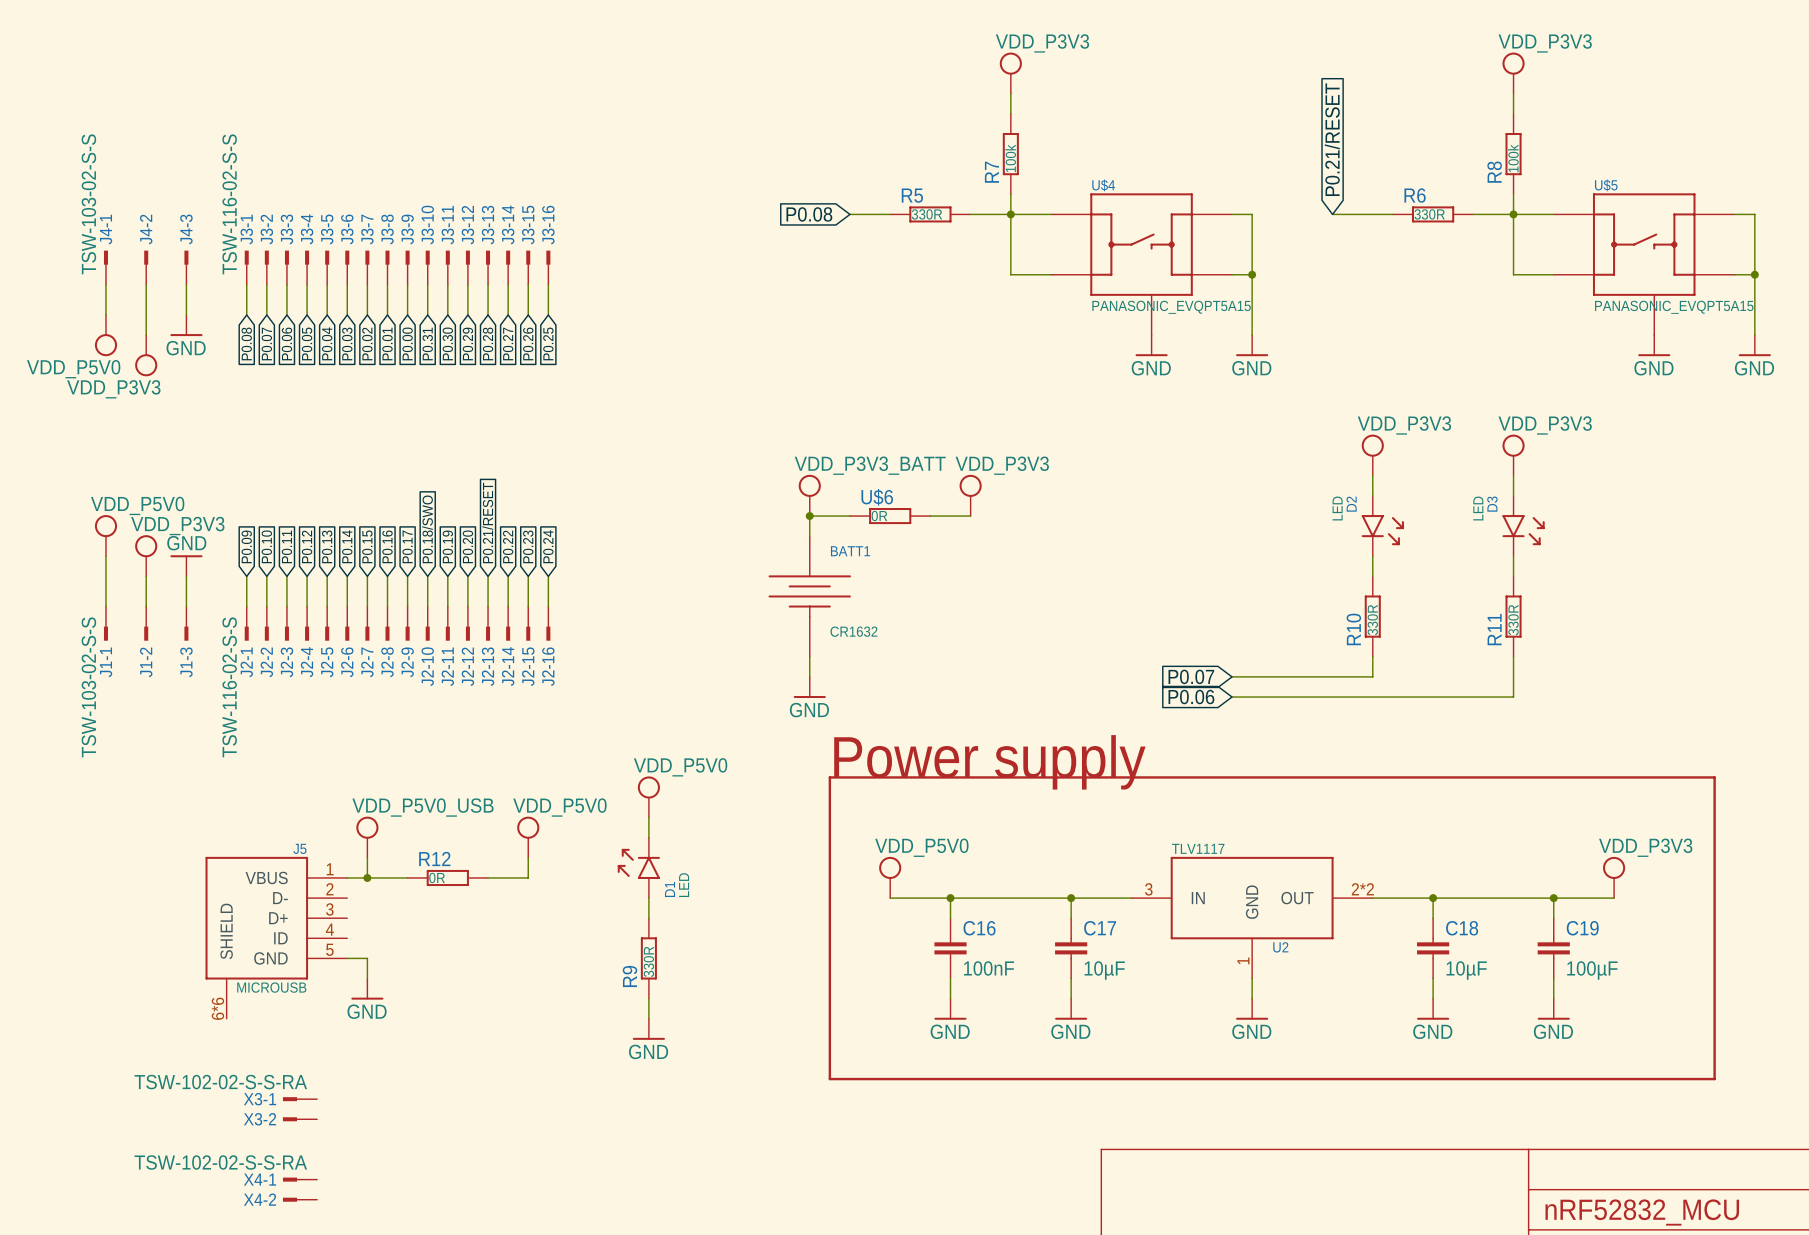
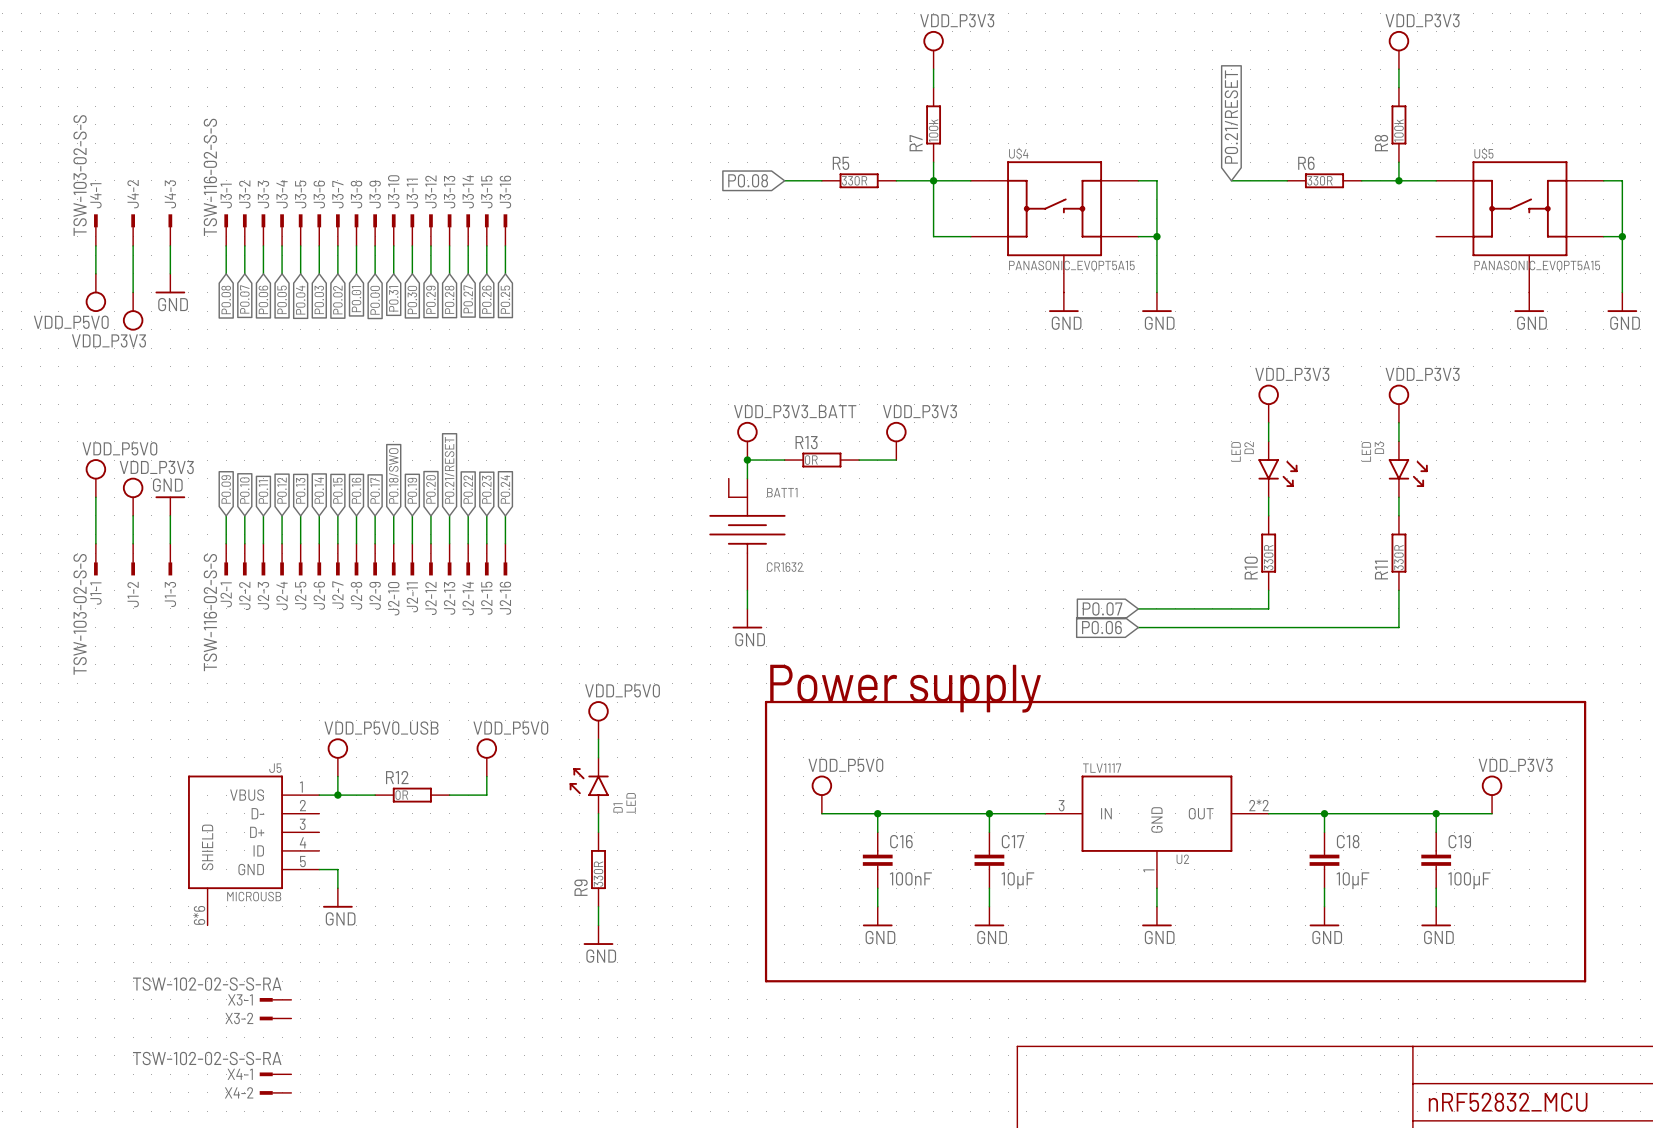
wire: (1513, 214) (1513, 274) (1553, 274) -> none
U$6 name: U$6 (877, 497) -> R13 (806, 442)
BATT1 symbol: [768, 536, 851, 657] -> [709, 478, 786, 591]

